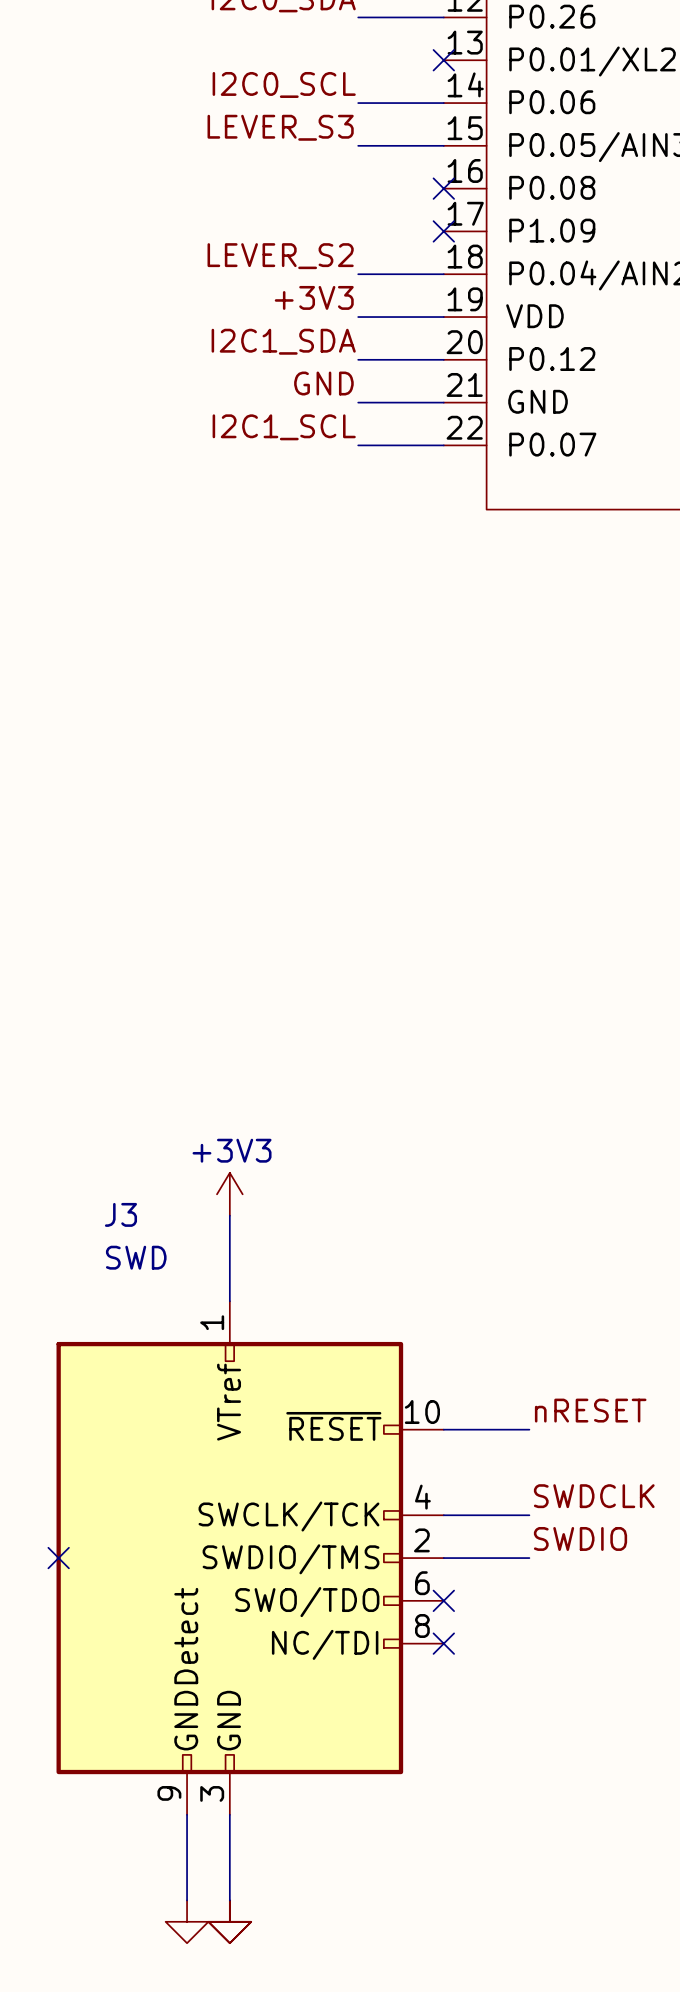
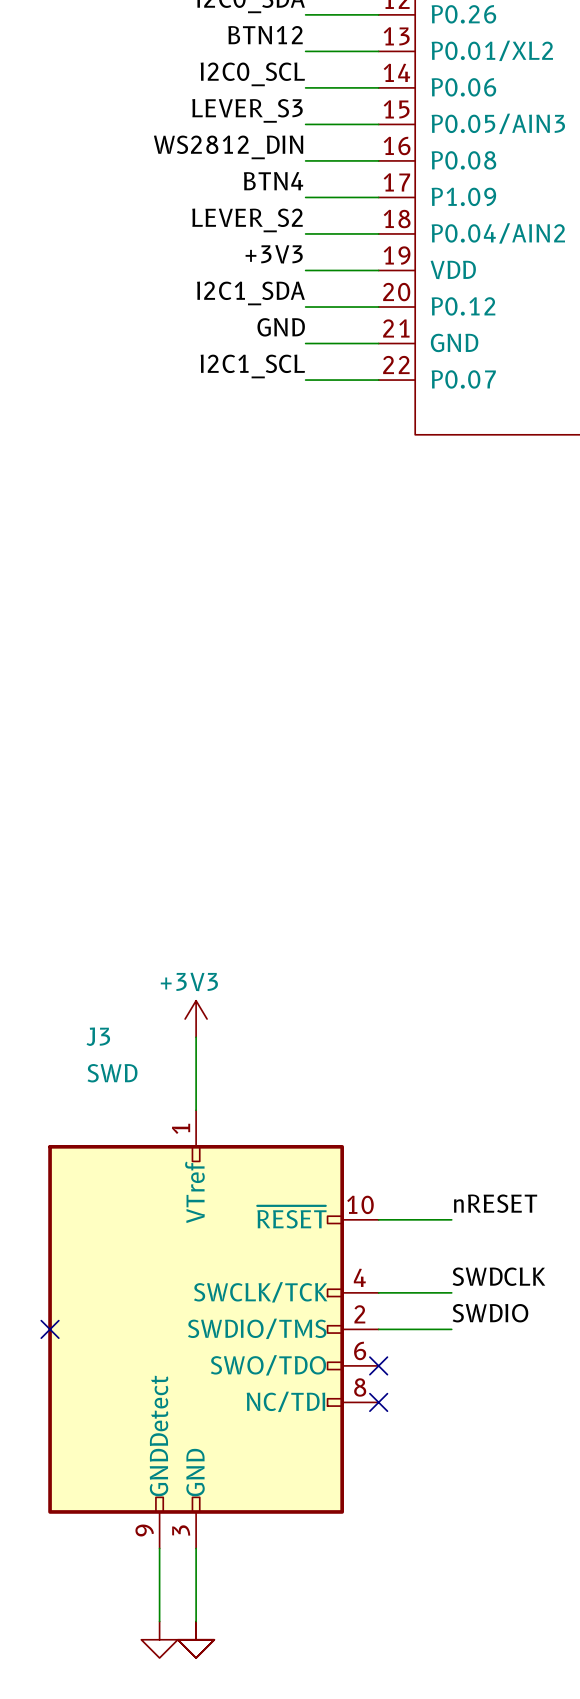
label: none -> BTN12 (265, 35)
wire: none -> (305, 51) (378, 51)
no-connect mark: (443, 60) -> none
label: none -> WS2812_DIN (228, 147)
wire: none -> (305, 160) (378, 160)
no-connect mark: (443, 188) -> none
label: none -> BTN4 (273, 181)
wire: none -> (305, 197) (378, 197)
no-connect mark: (443, 231) -> none

